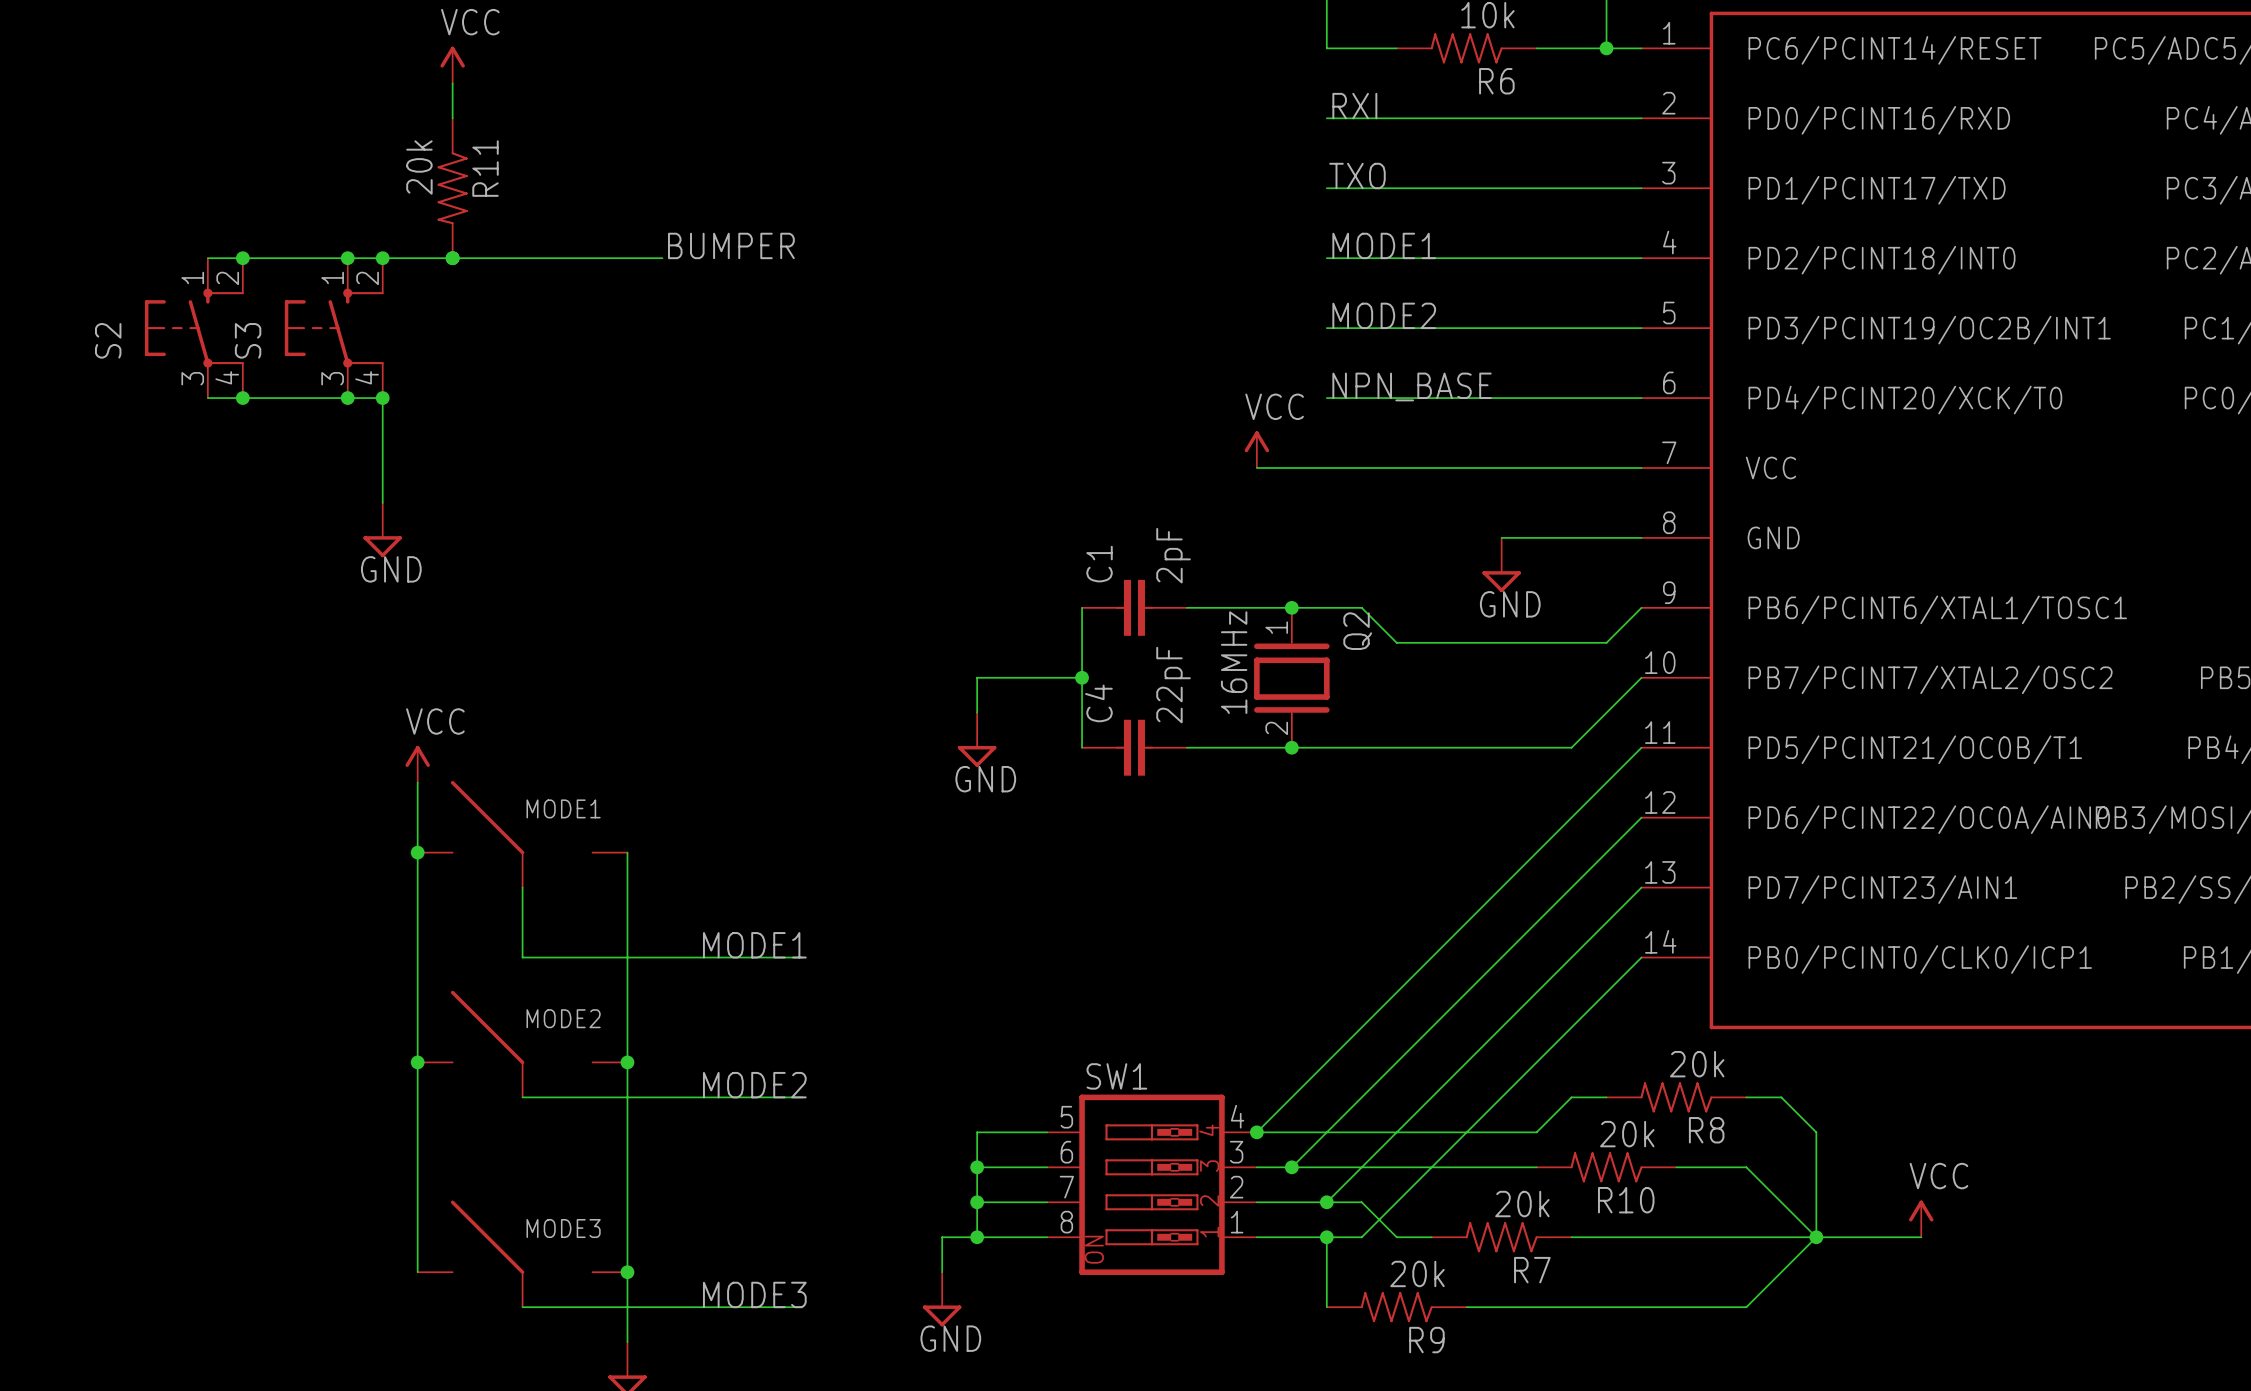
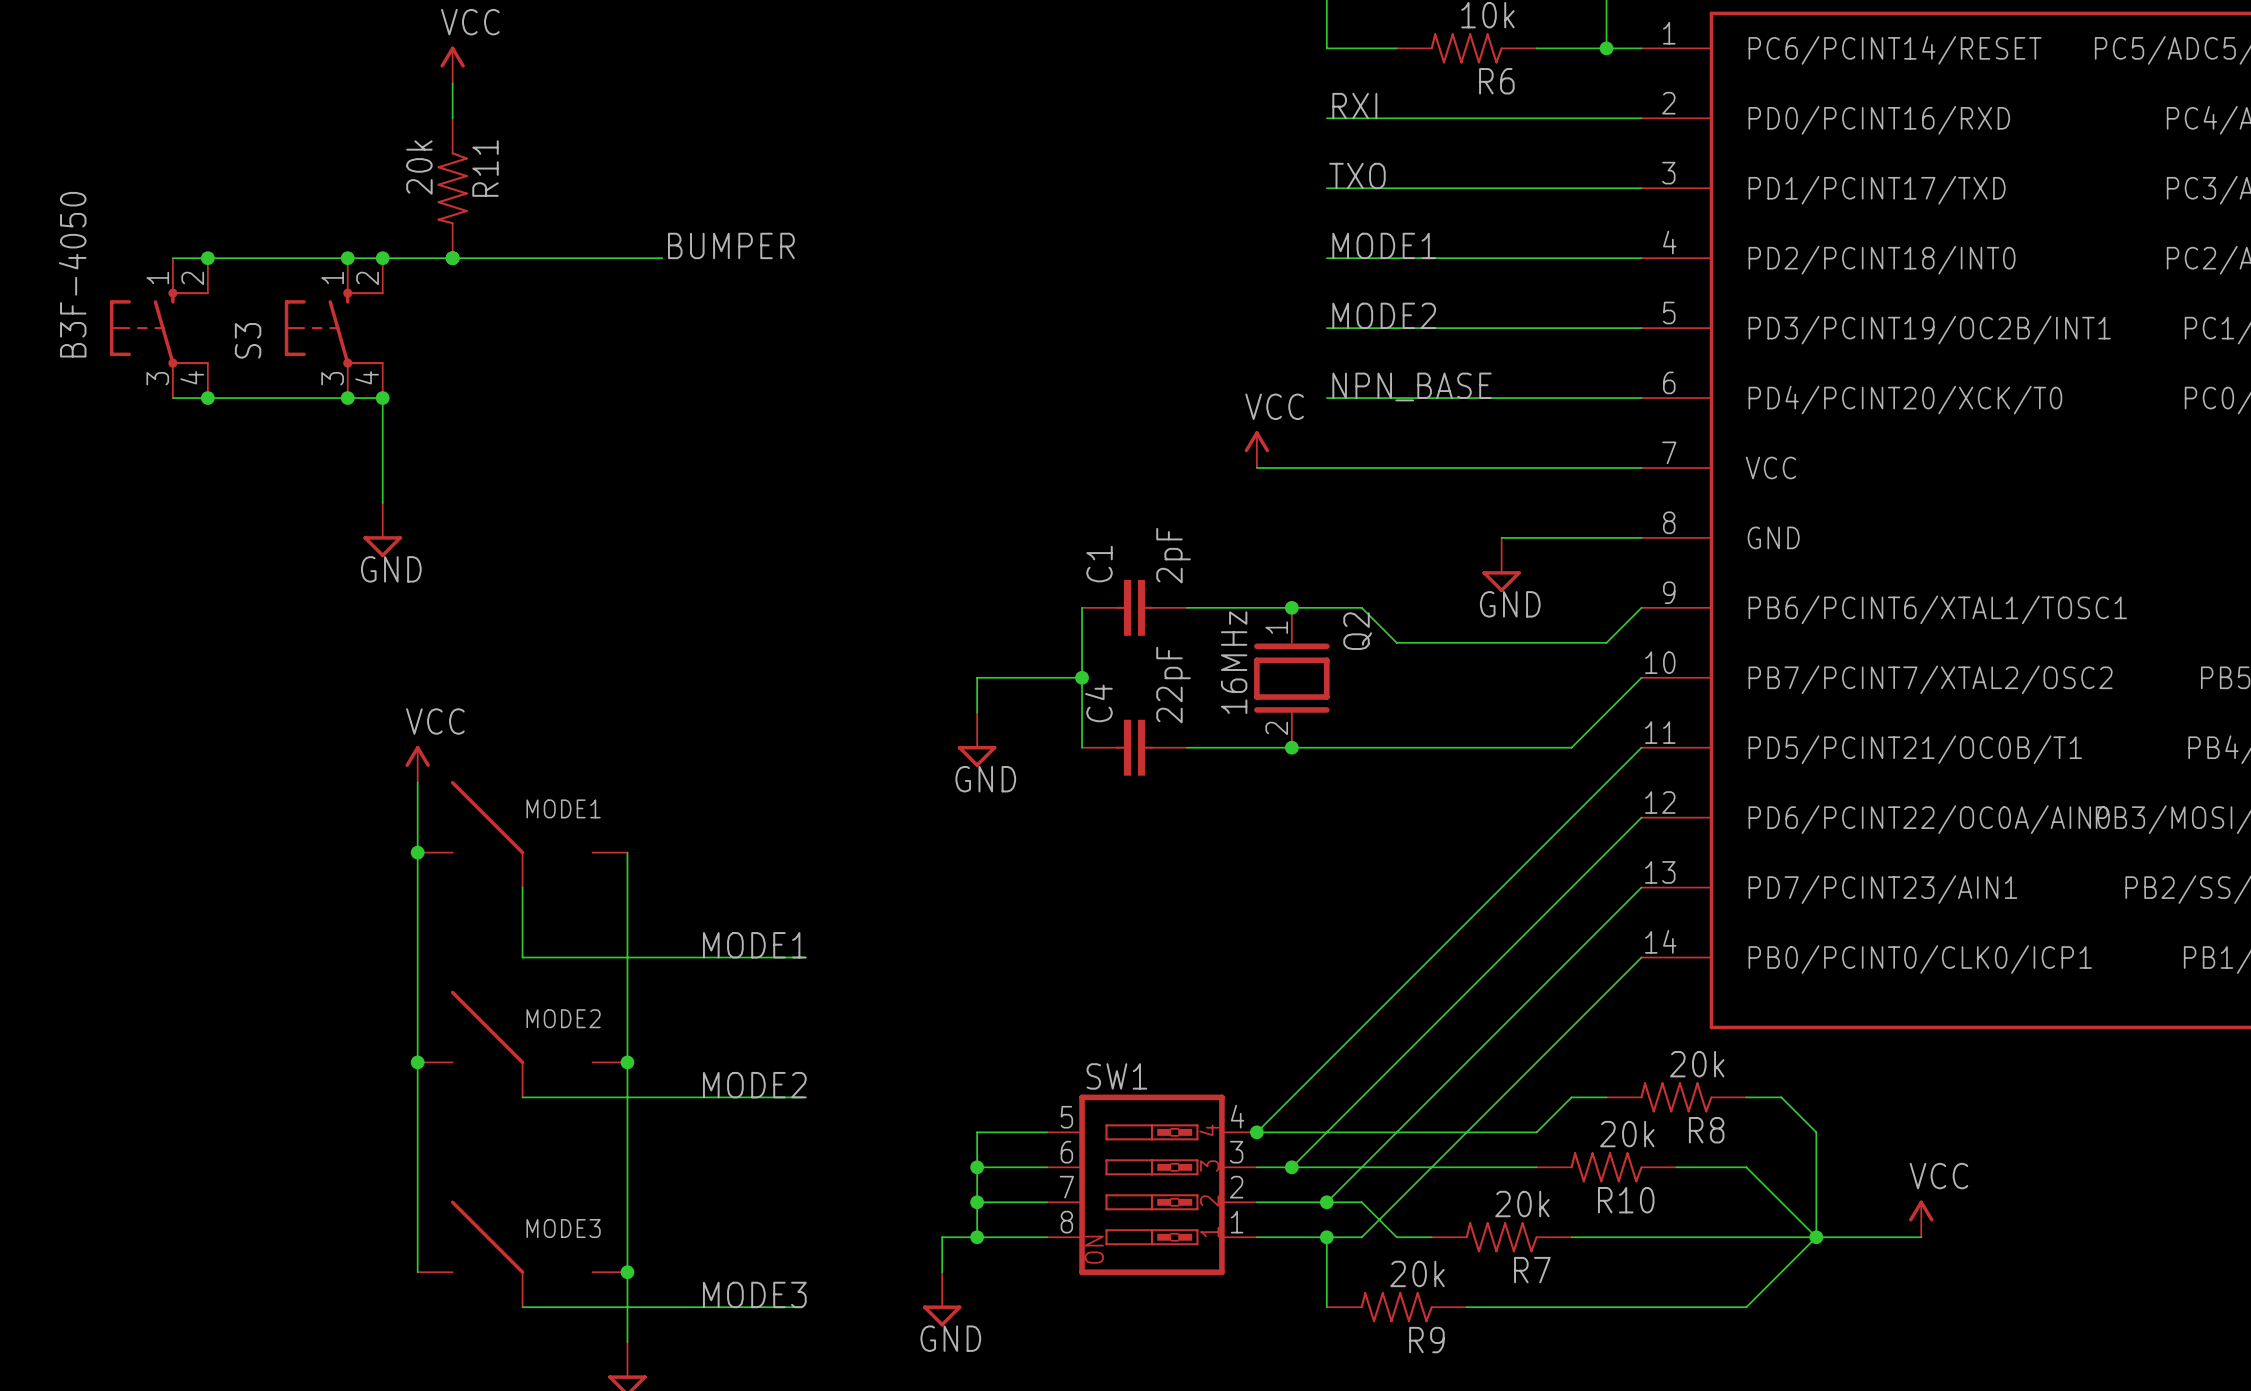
wire: none -> (172, 258) (207, 258)
junction position: (242, 258) -> (207, 258)
B3F-4050: none -> (159, 328)
S2: (194, 328) -> none
wire: none -> (172, 398) (207, 398)
junction position: (242, 398) -> (207, 398)

